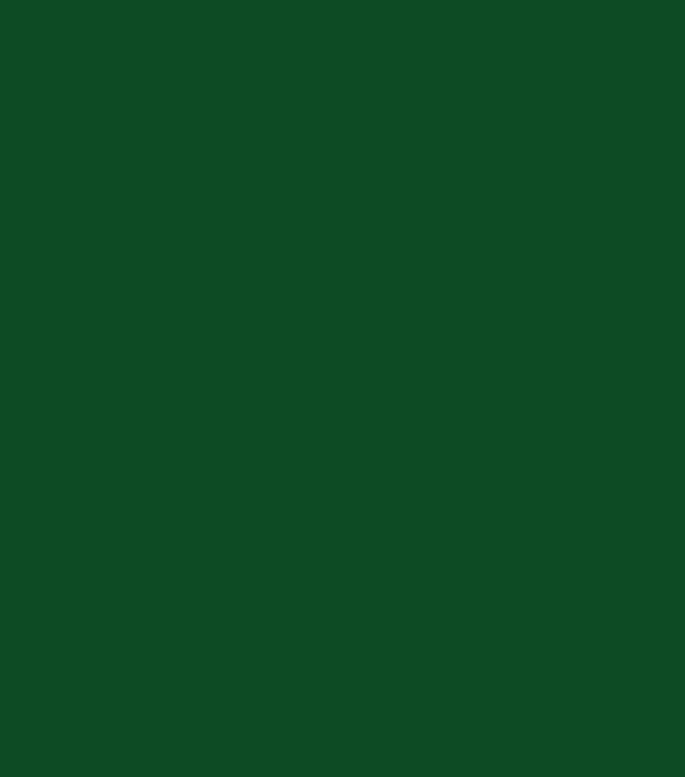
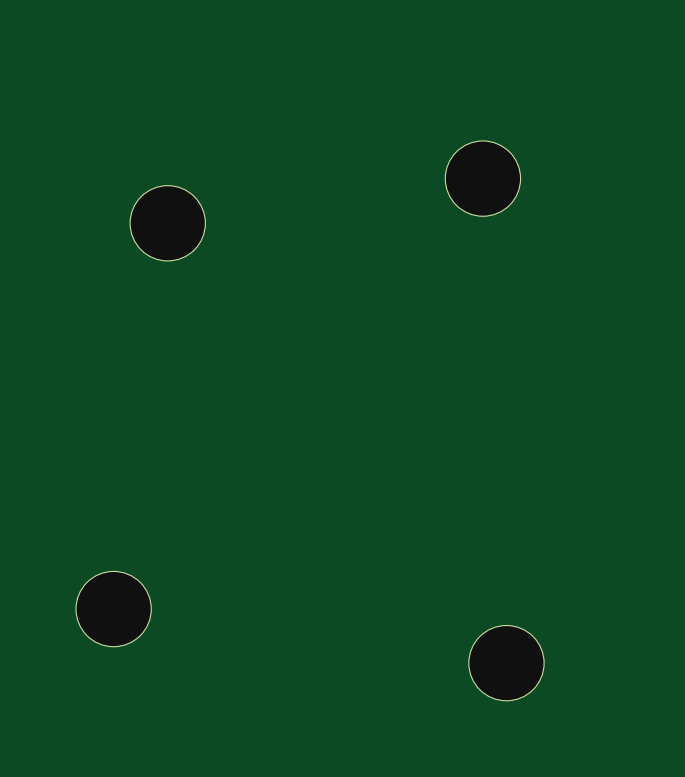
part: none -> (482, 178)
part: none -> (167, 223)
part: none -> (113, 609)
part: none -> (506, 663)

